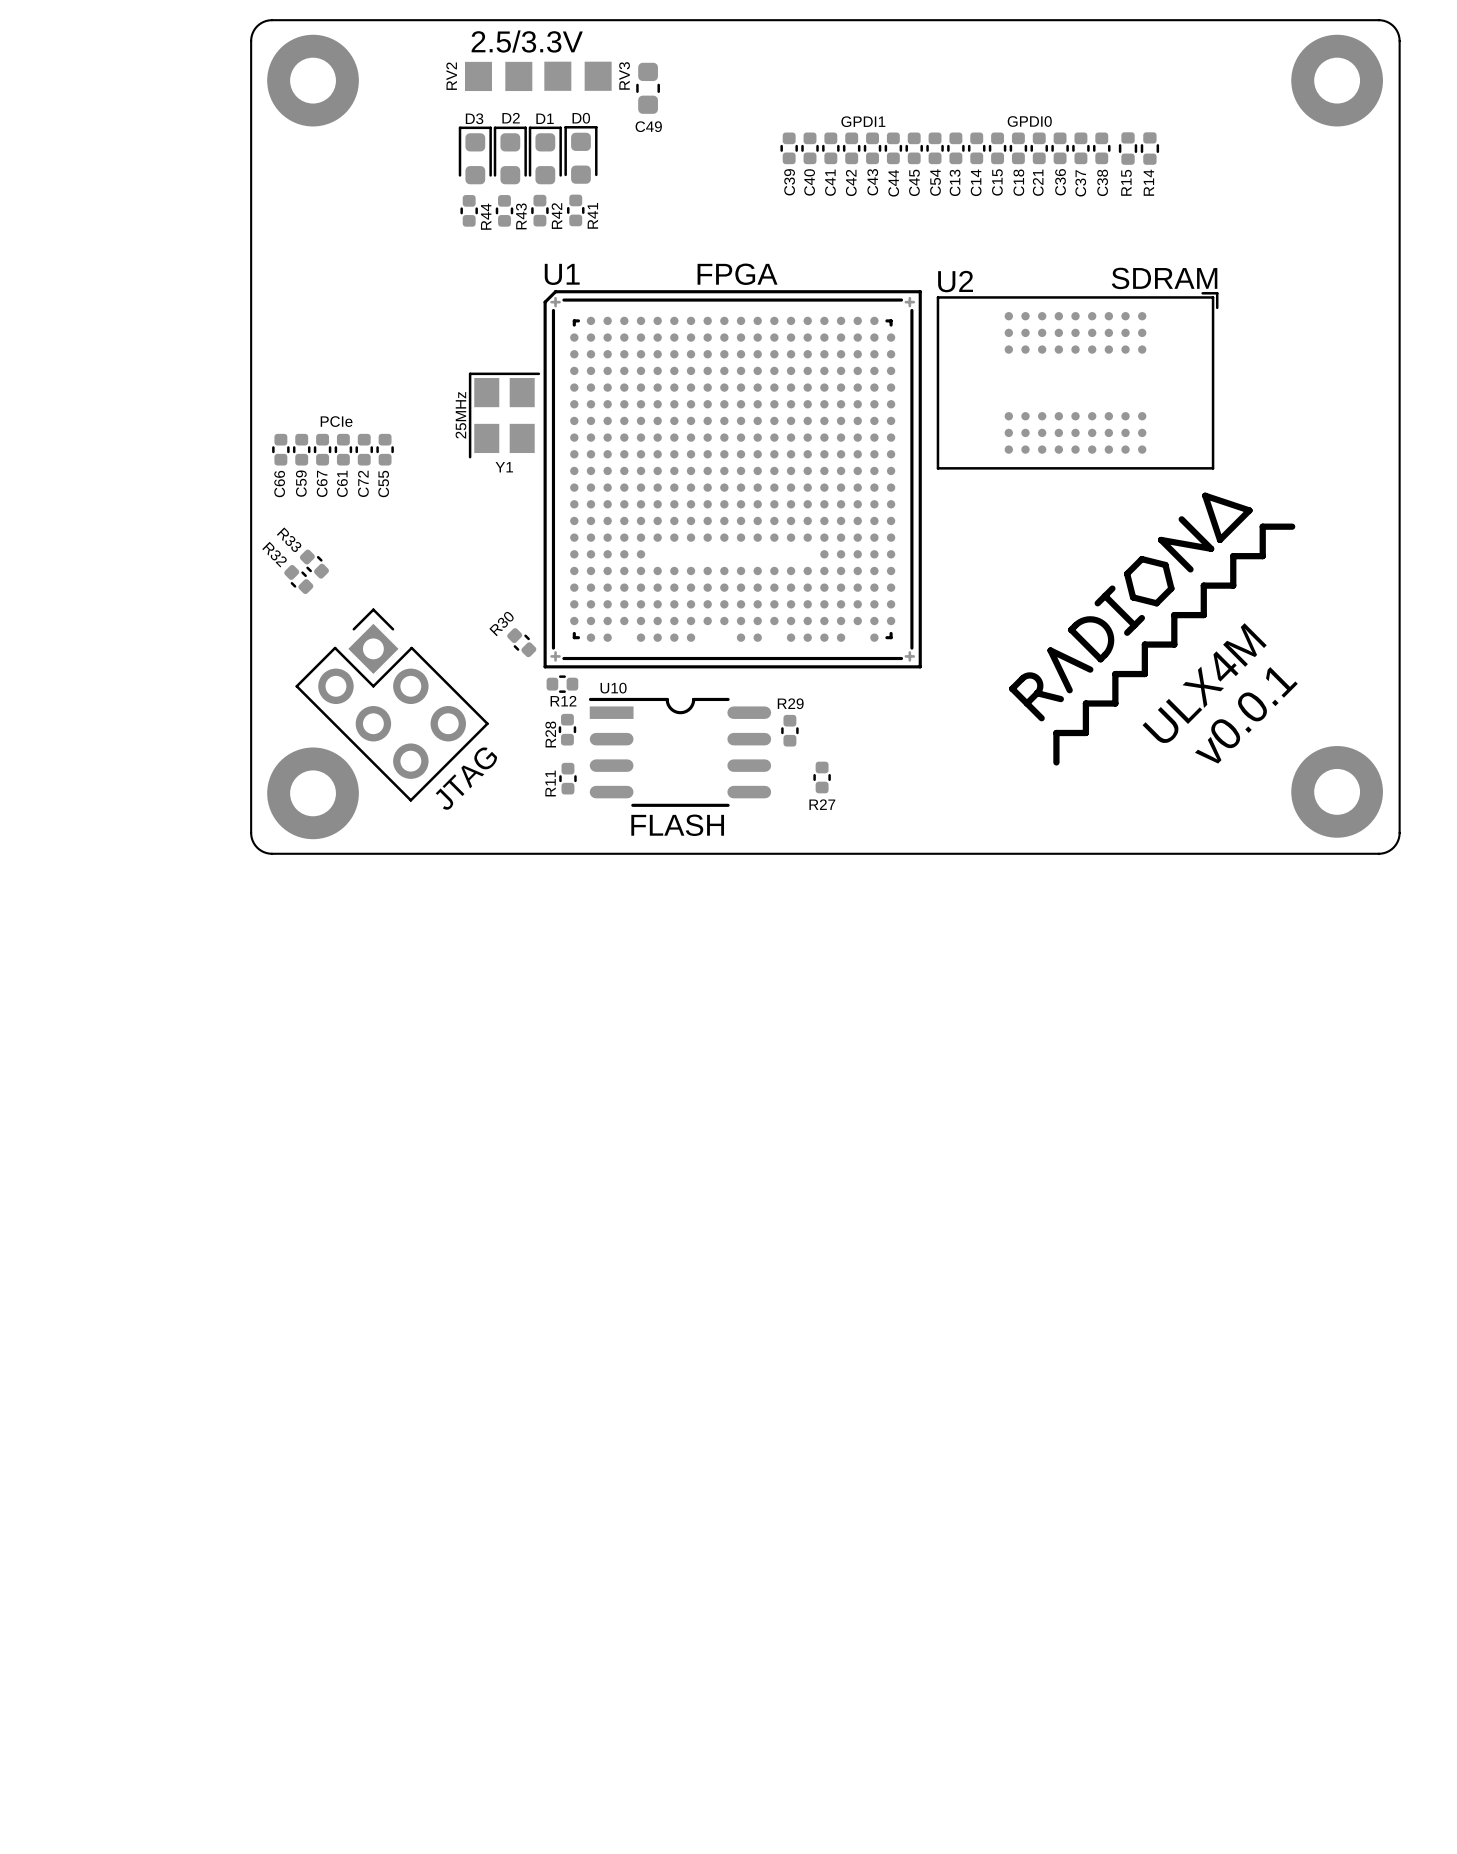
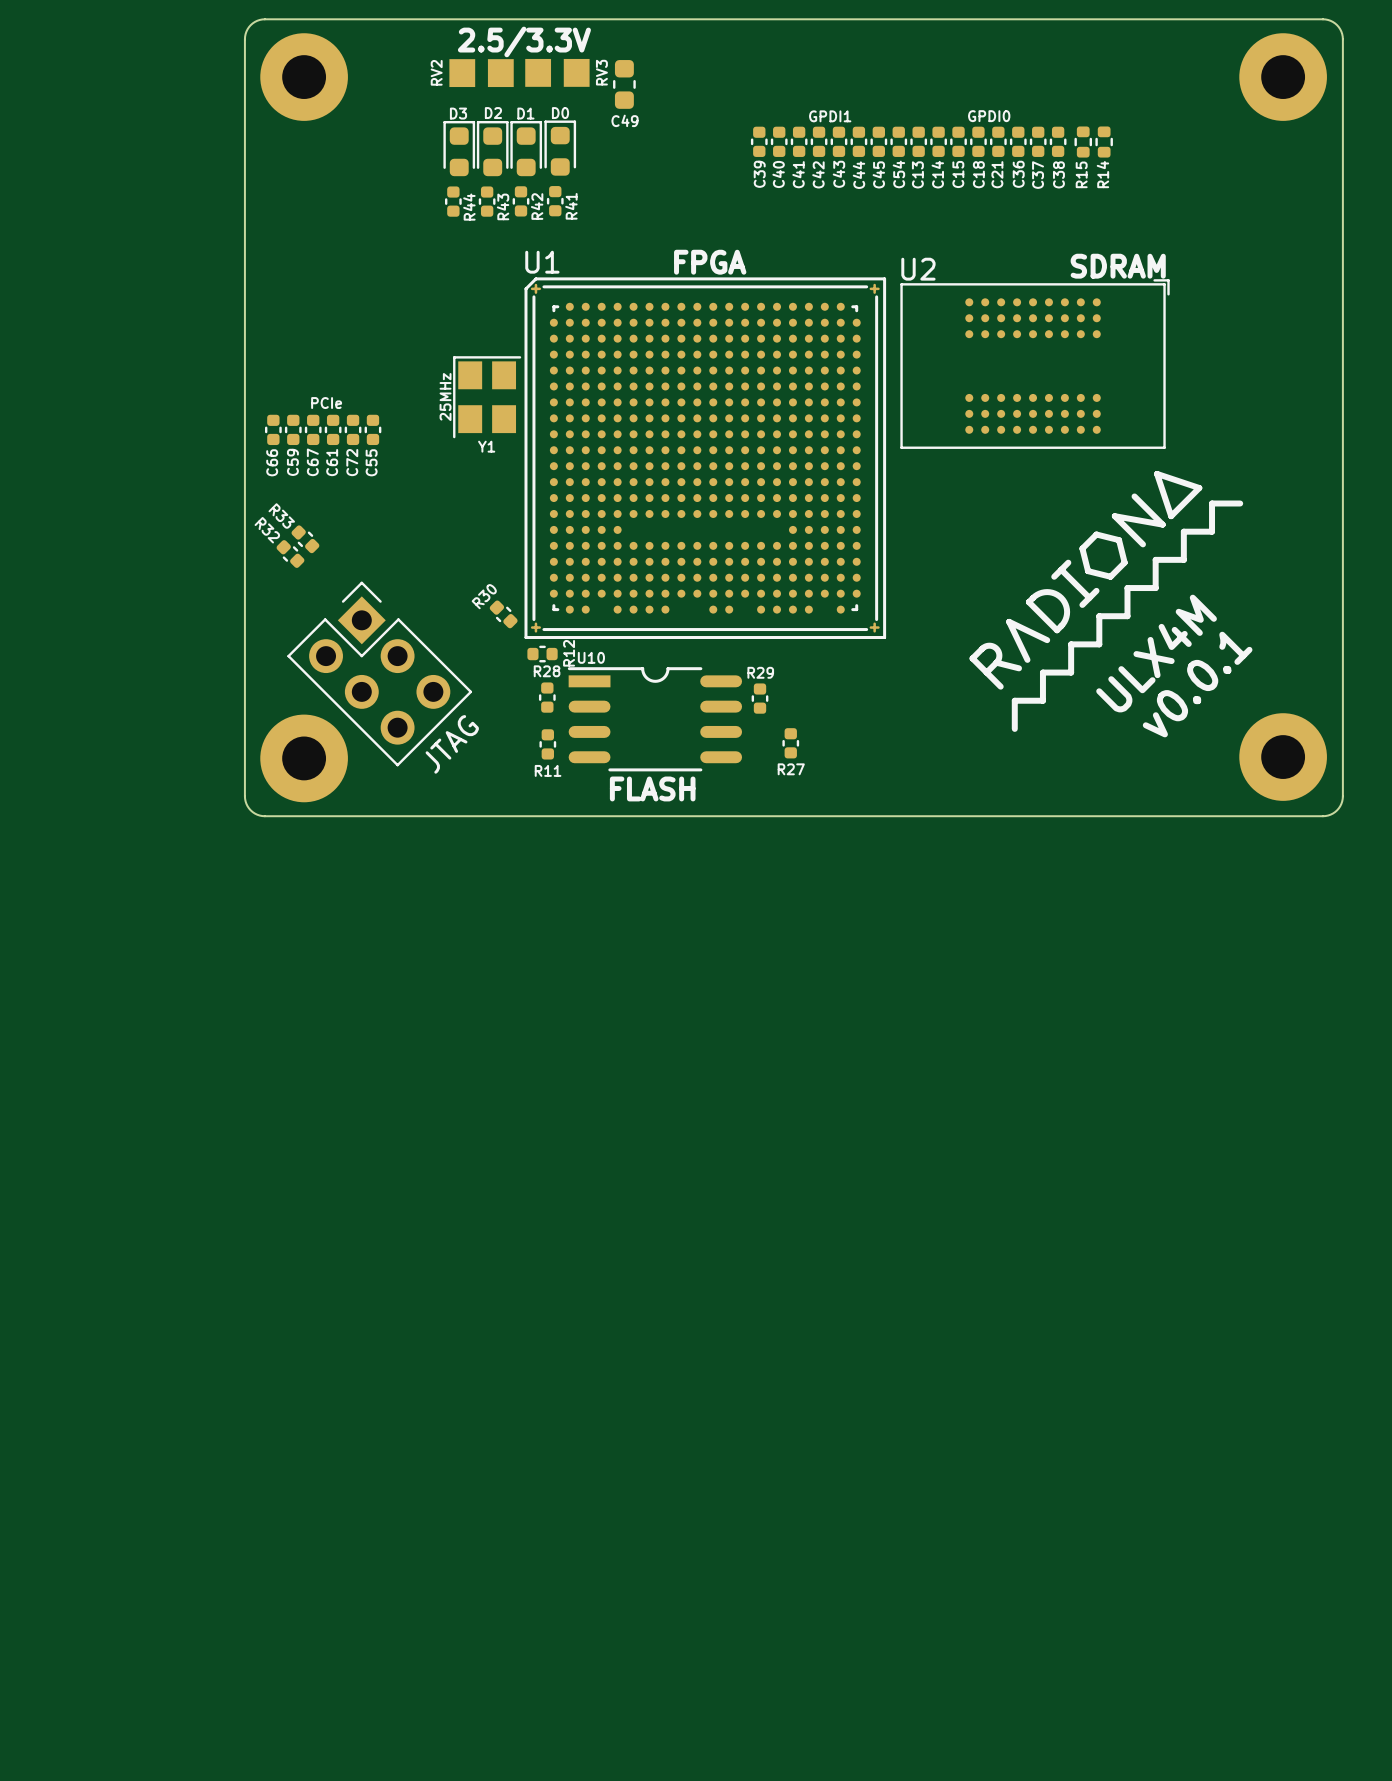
R12 name rotation: 0° (563, 701) -> 90° counterclockwise (569, 653)
R28 name rotation: 0° (550, 734) -> 90° clockwise (547, 671)
R11 name rotation: 0° (550, 783) -> 90° clockwise (548, 770)

